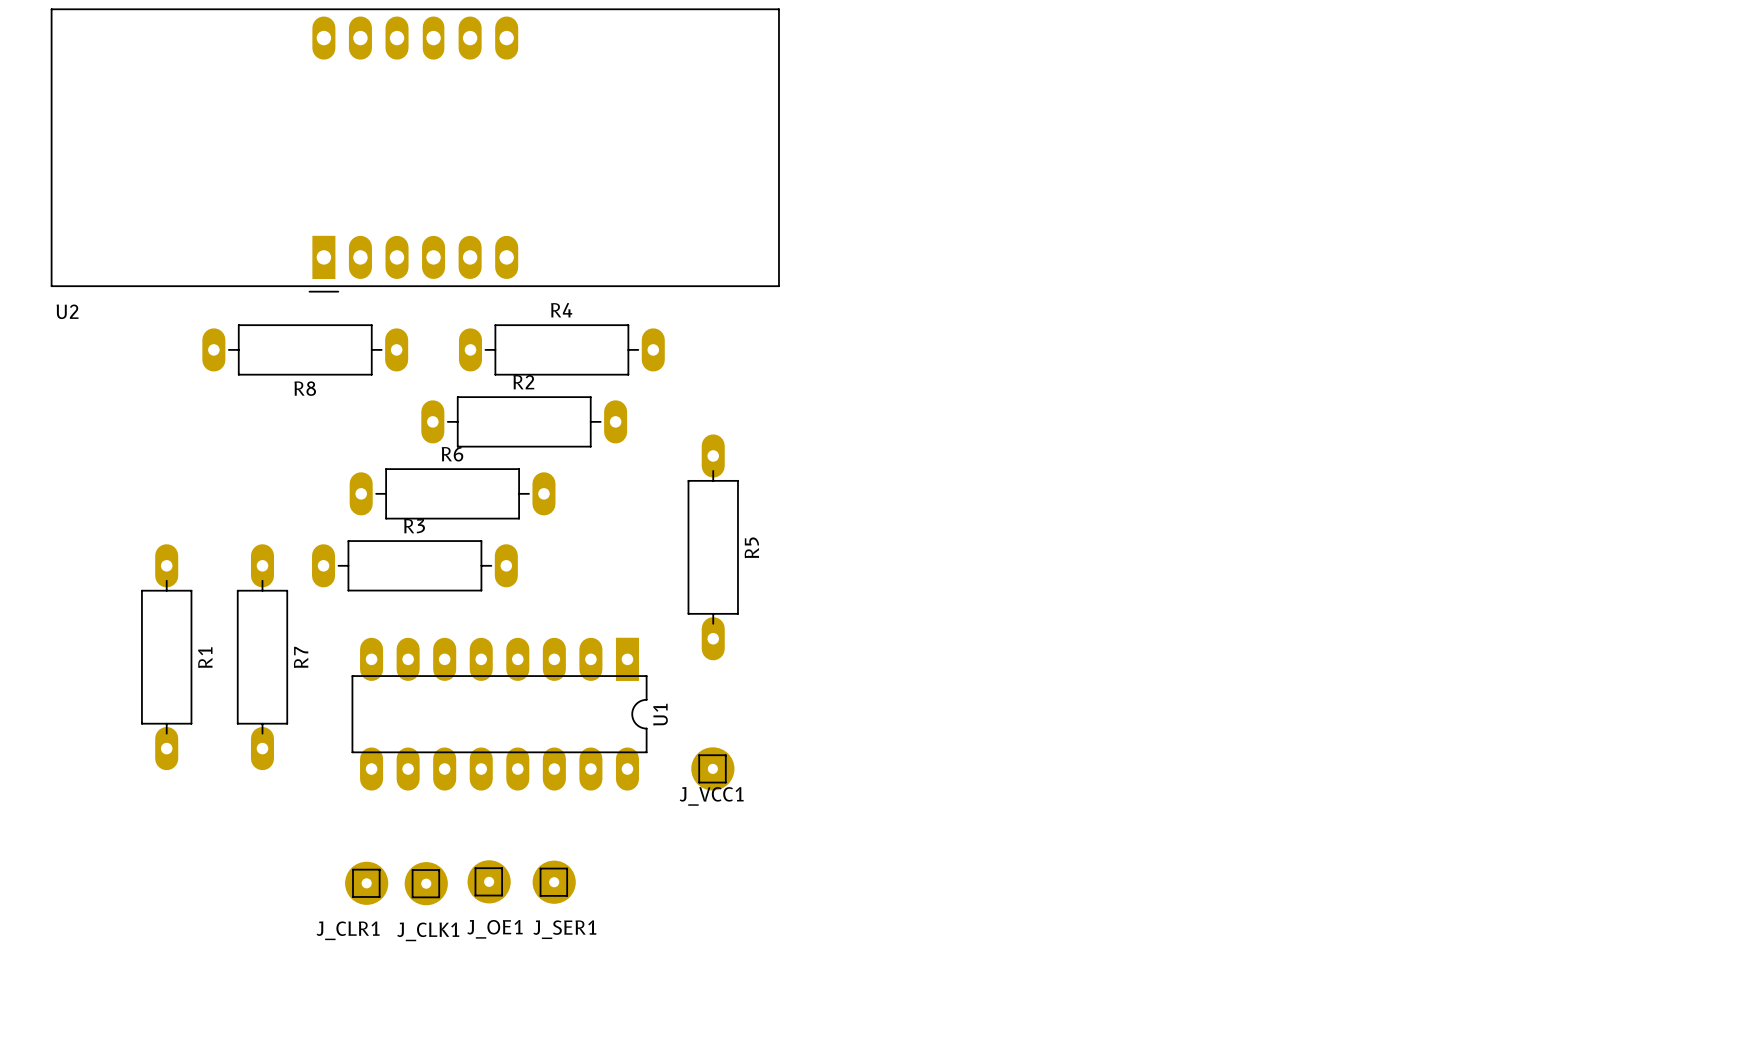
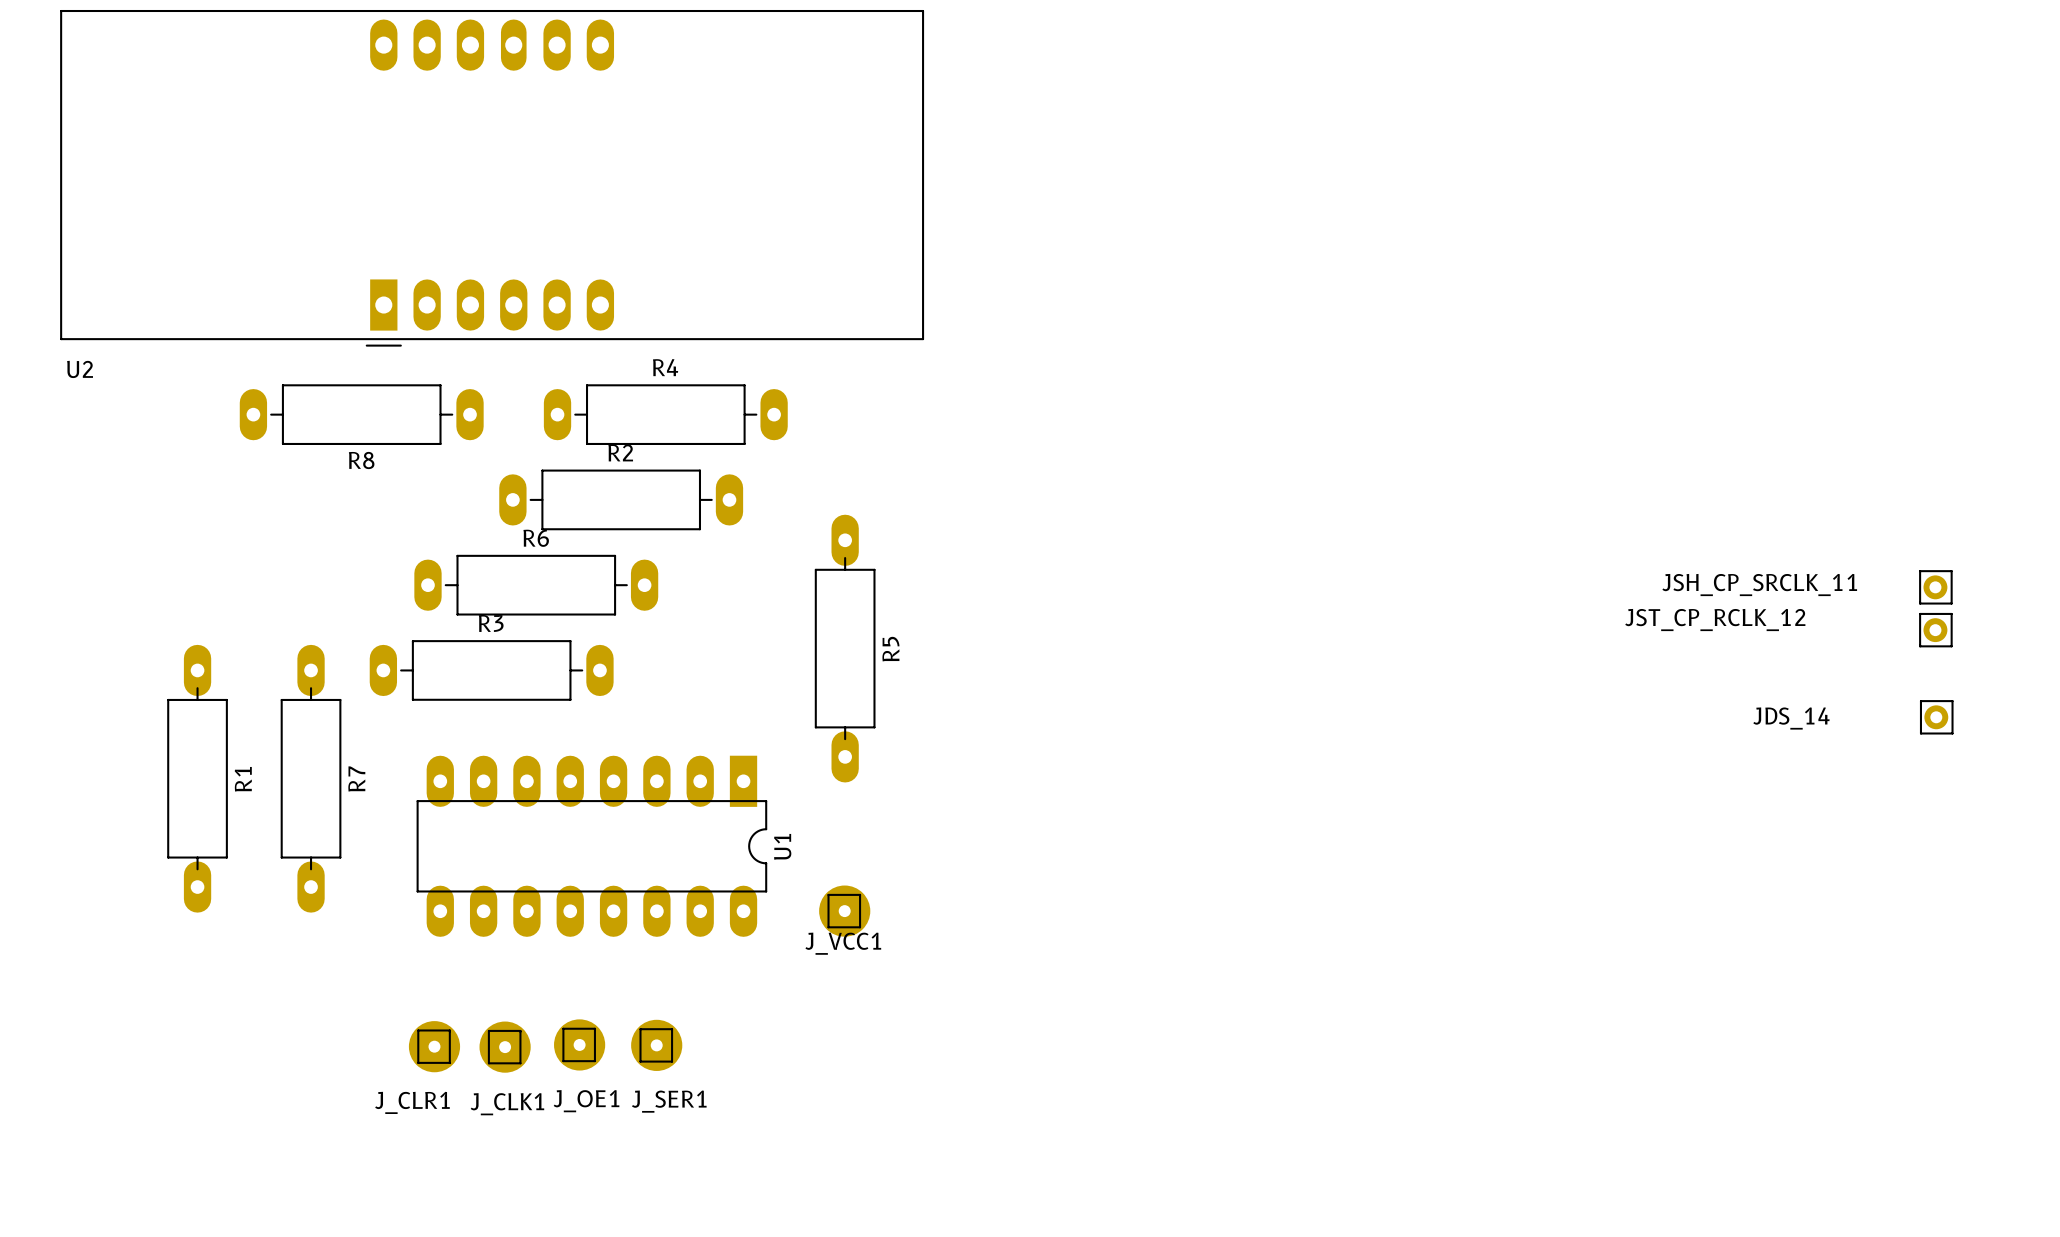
JSH_CP_SRCLK_11: none -> (1935, 587)
JST_CP_RCLK_12: none -> (1935, 630)
JDS_14: none -> (1936, 717)

